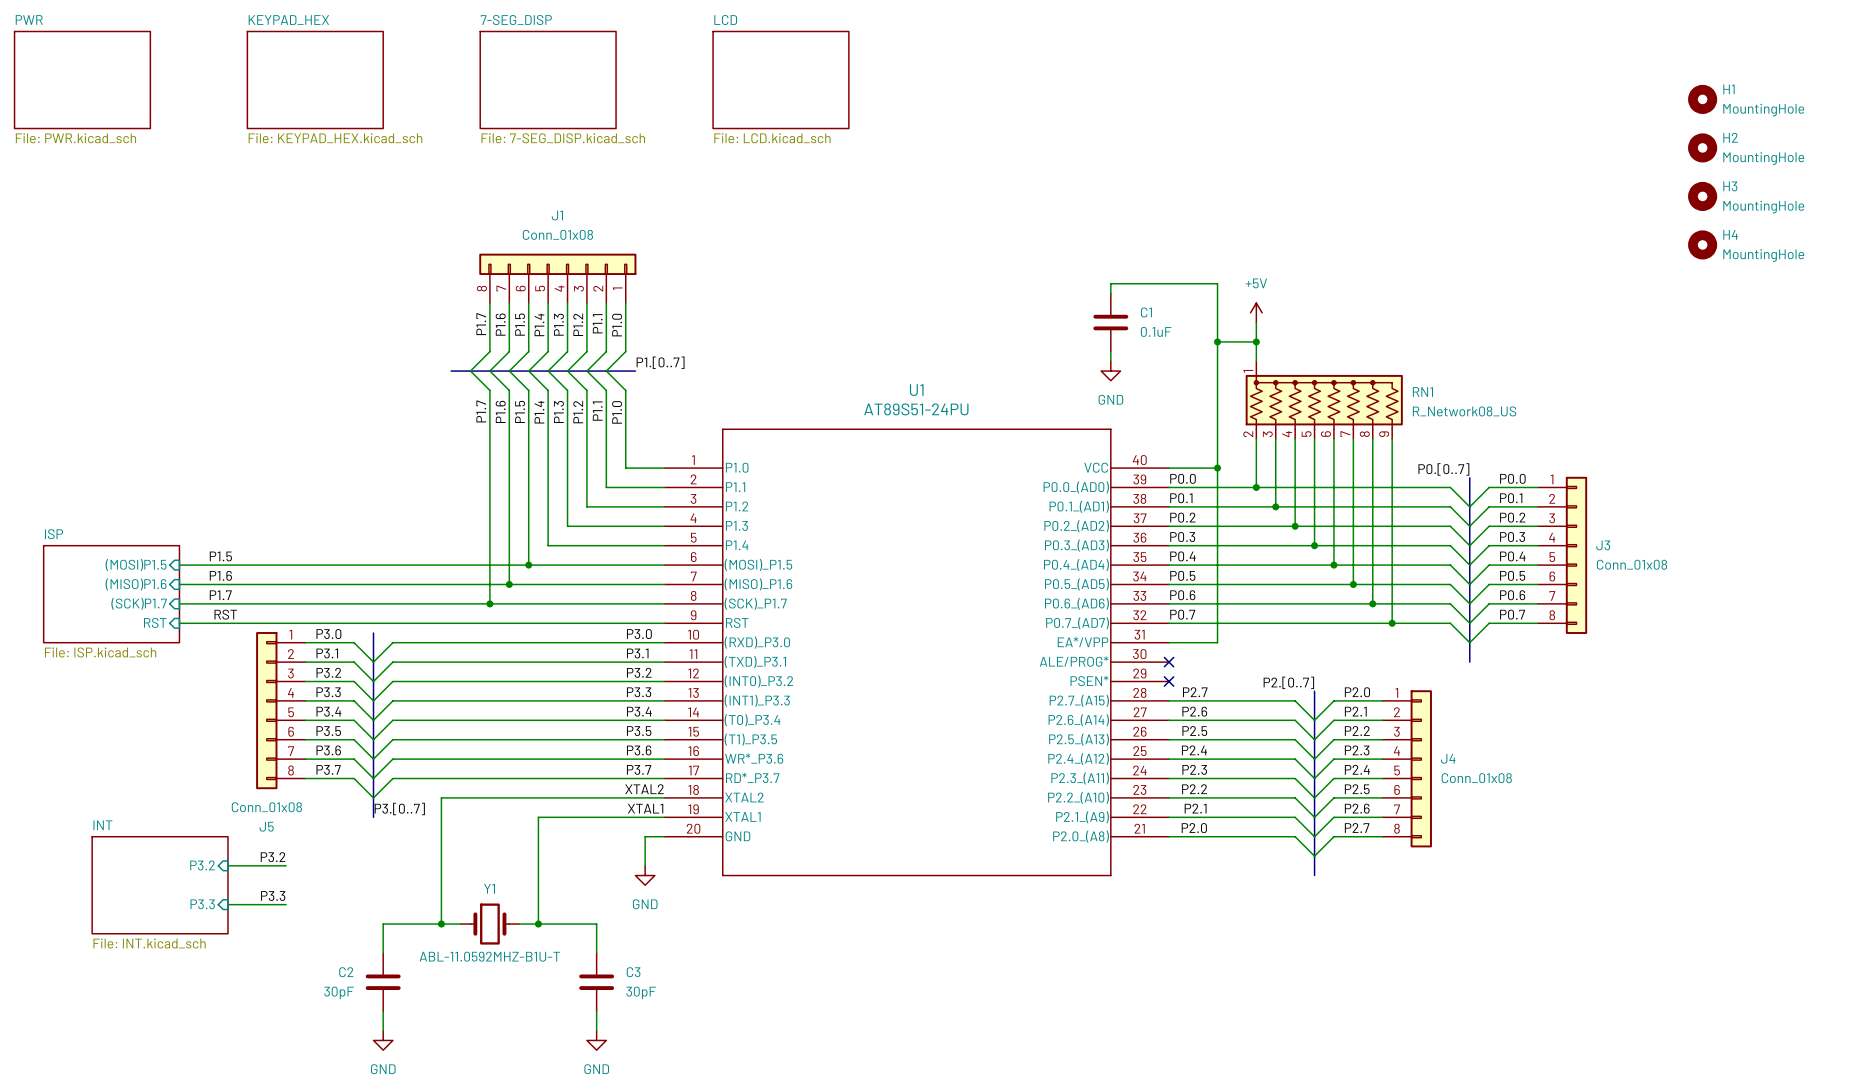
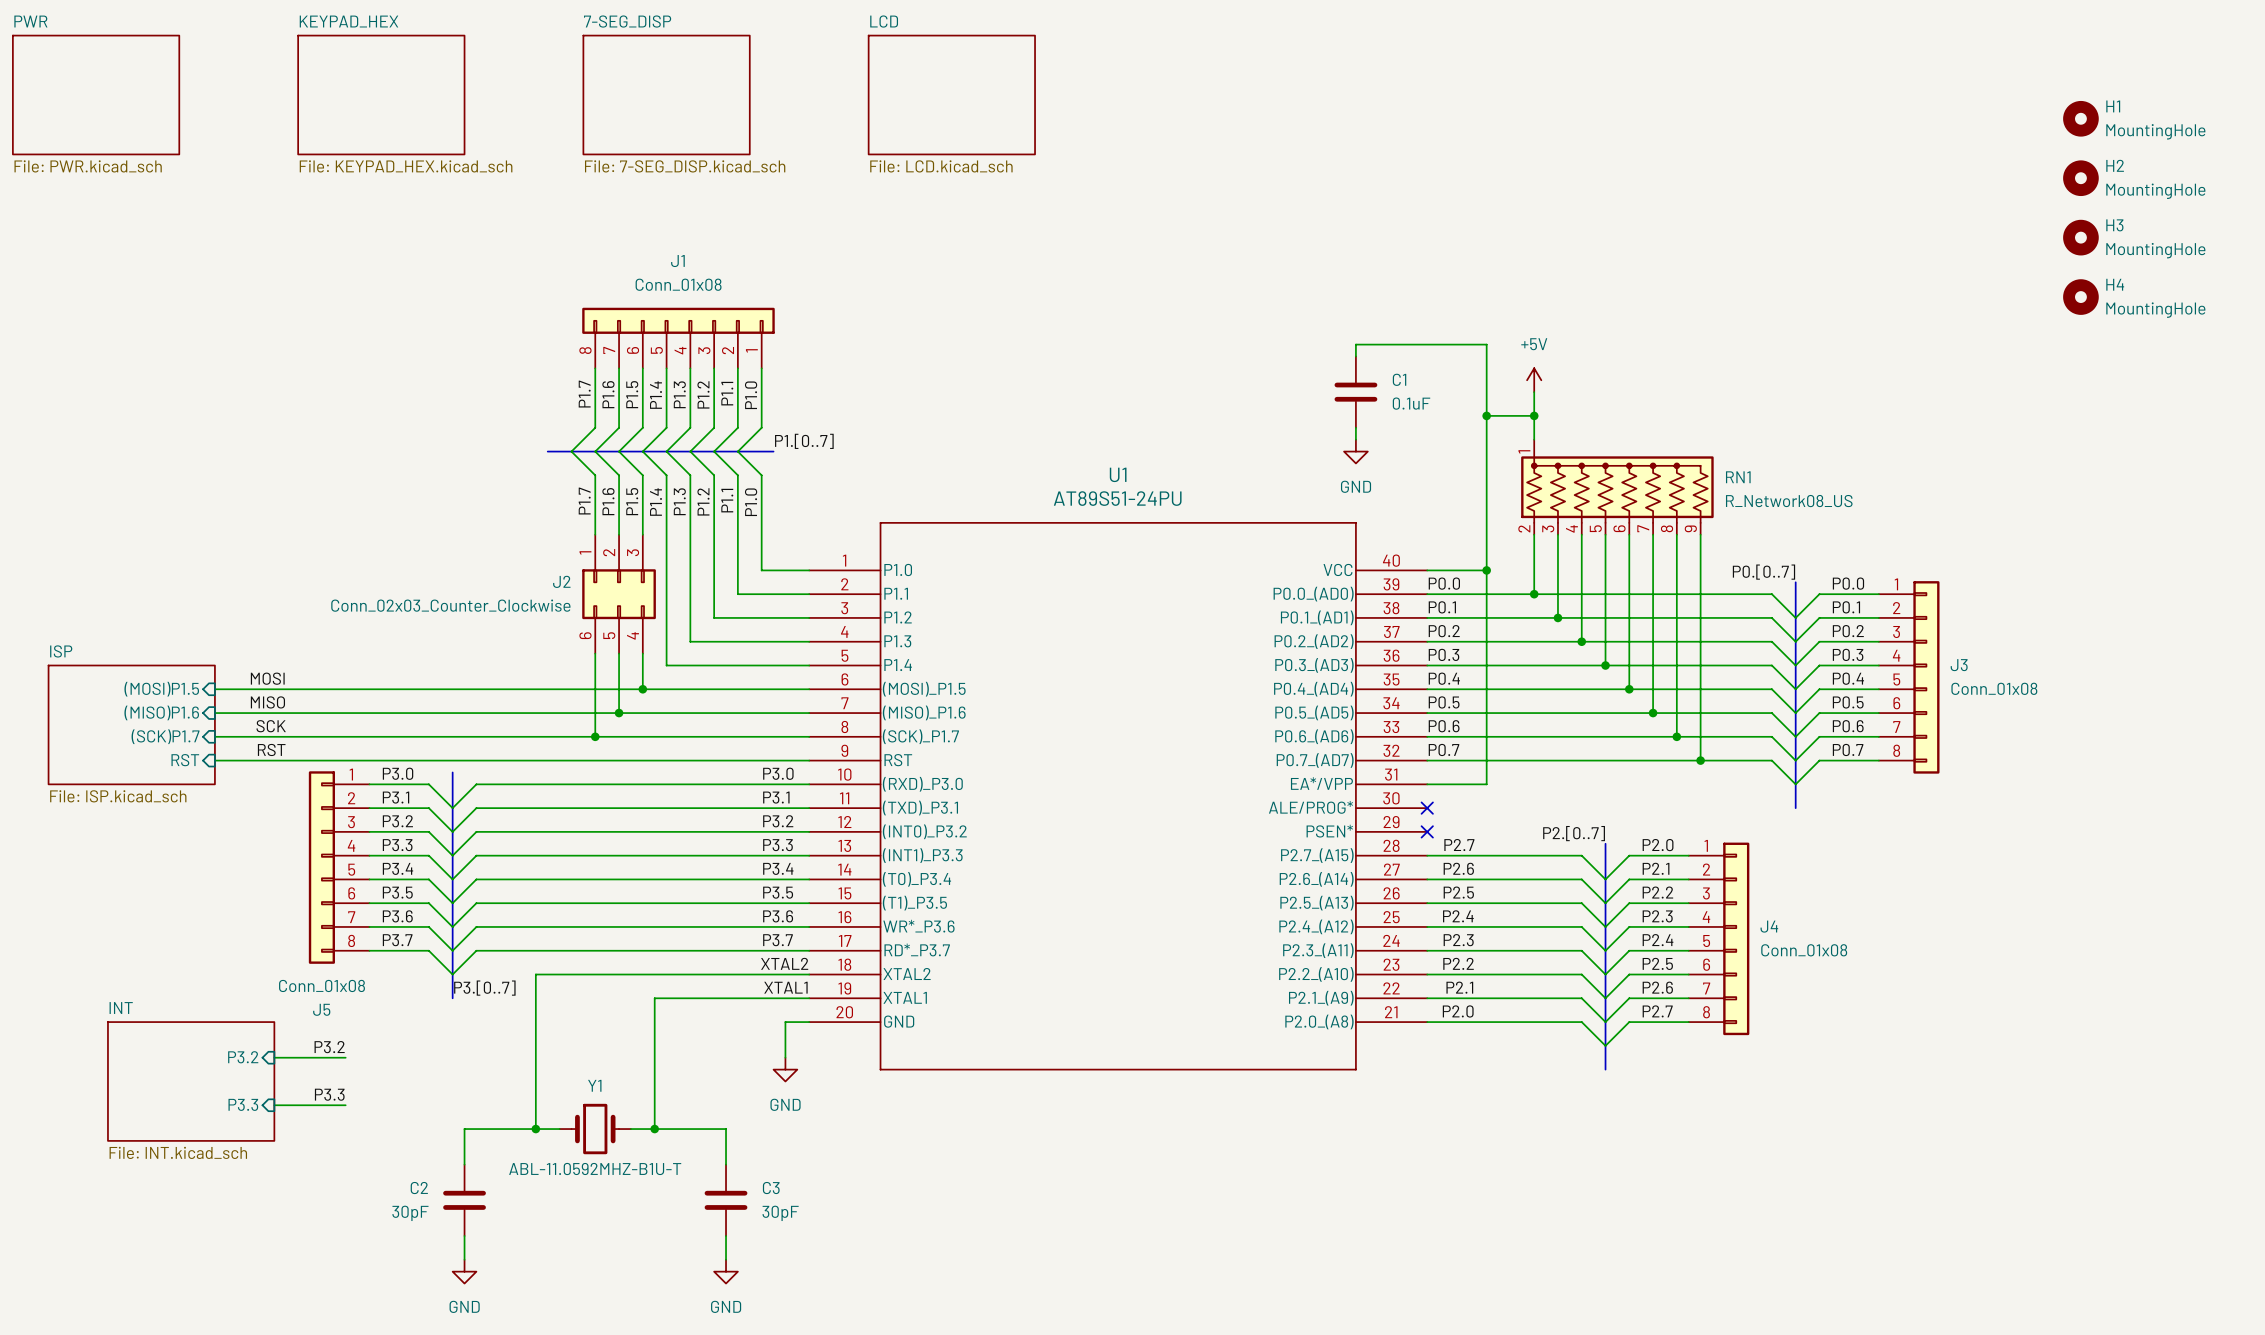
J2: none -> Conn_02x03_Counter_Clockwise (619, 594)
label: P1.5 (220, 556) -> none
label: none -> MOSI (267, 678)
label: P1.6 (220, 575) -> none
label: none -> MISO (267, 702)
label: P1.7 (220, 595) -> none
label: none -> SCK (271, 726)

